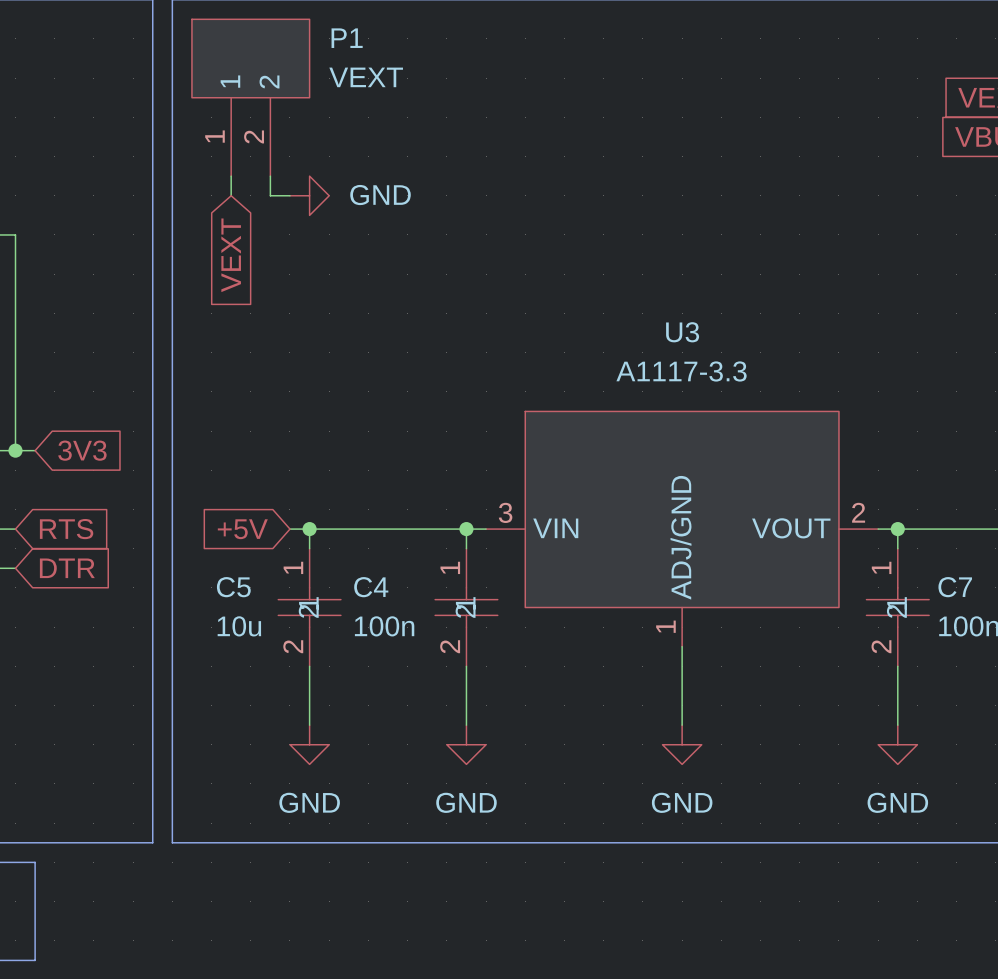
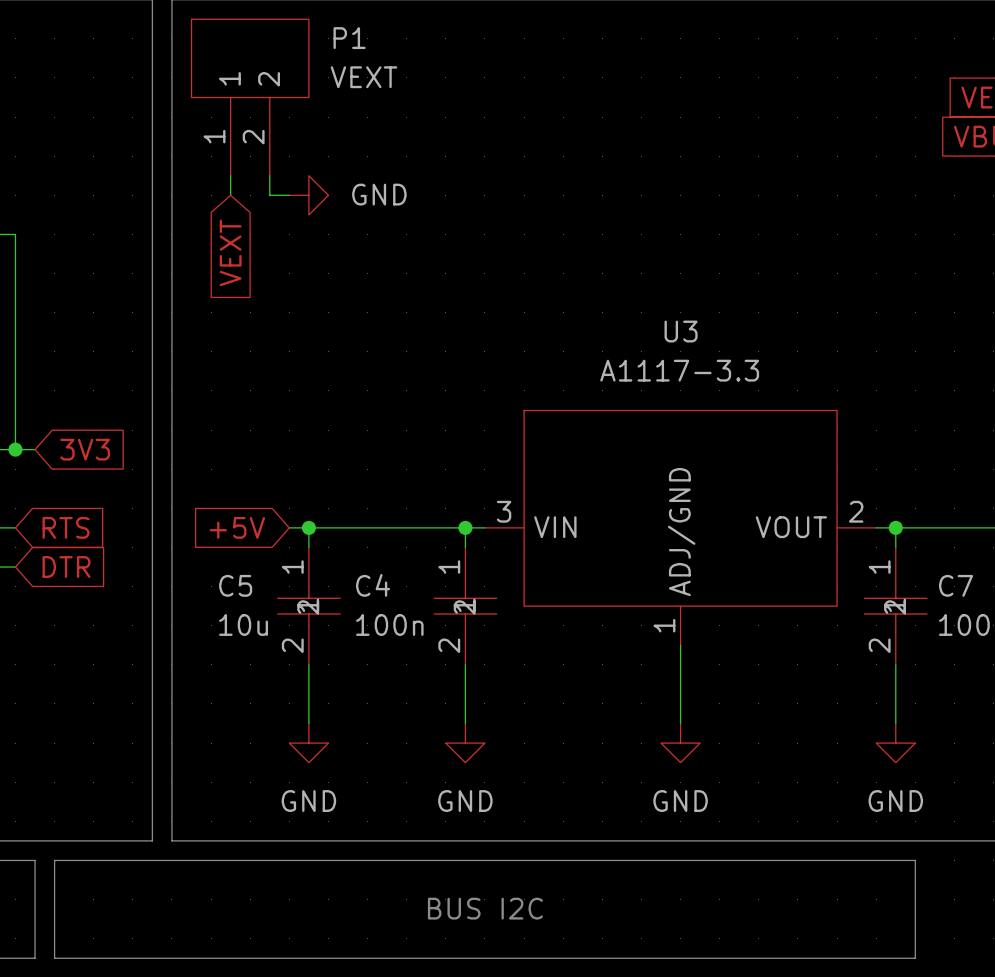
line: none -> (54, 860) (54, 958) (915, 958) (915, 860) (54, 860)
text: none -> BUS I2C (485, 908)

